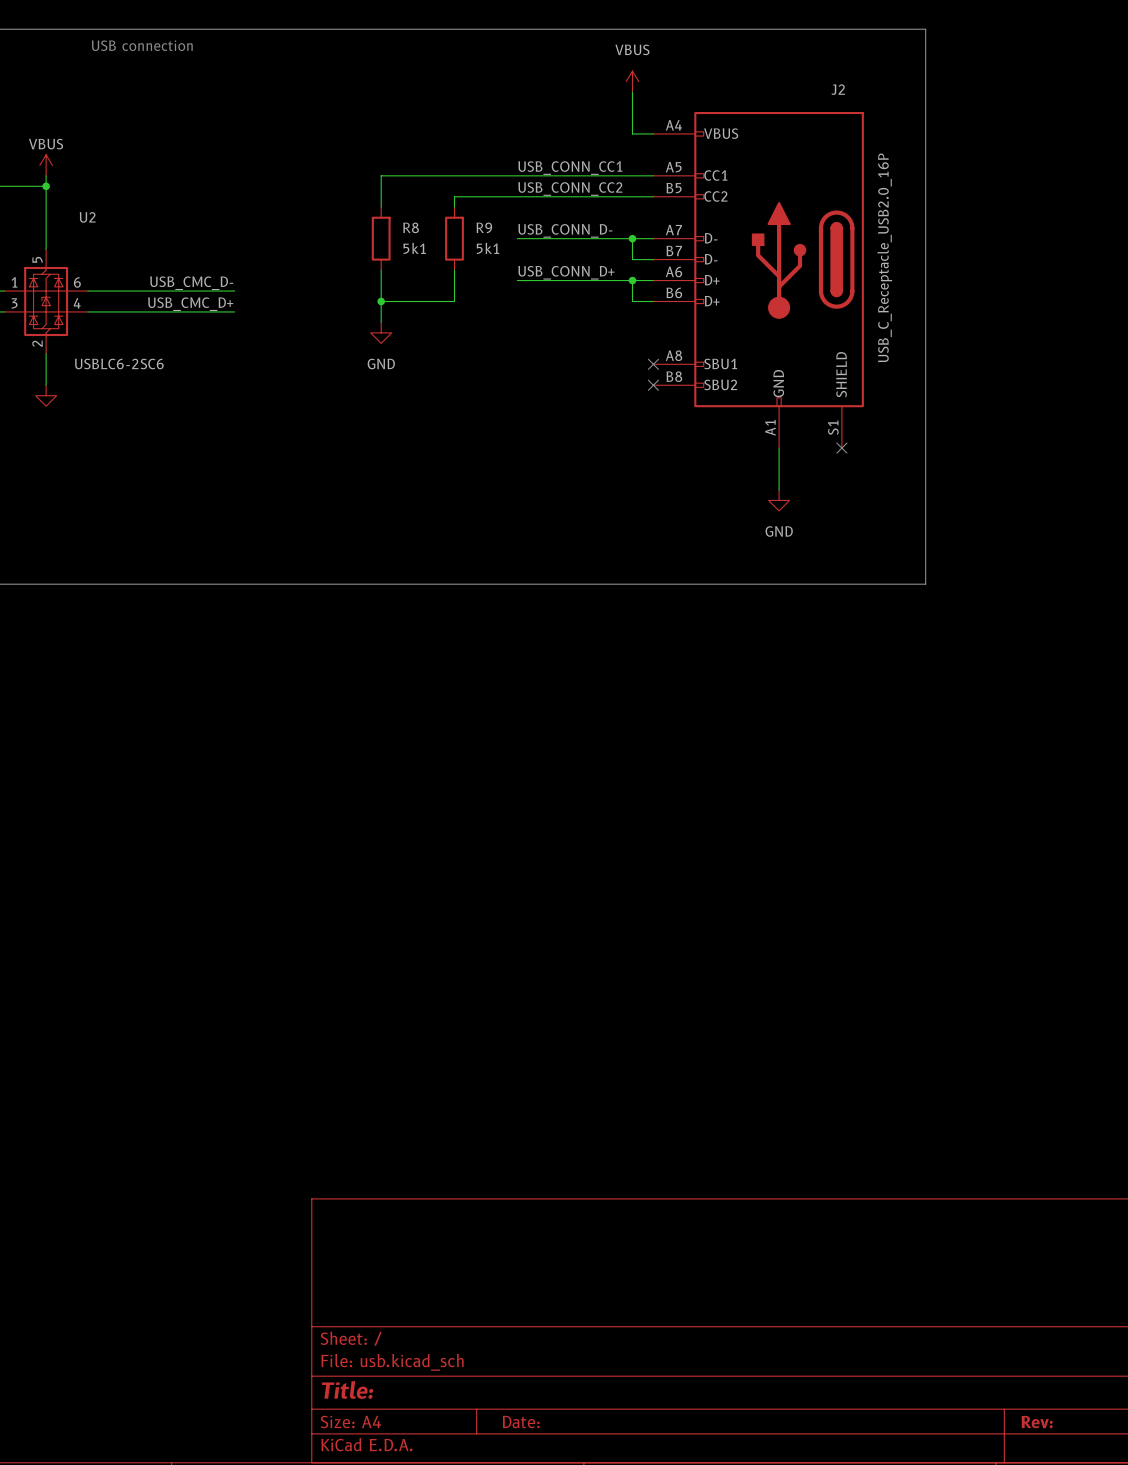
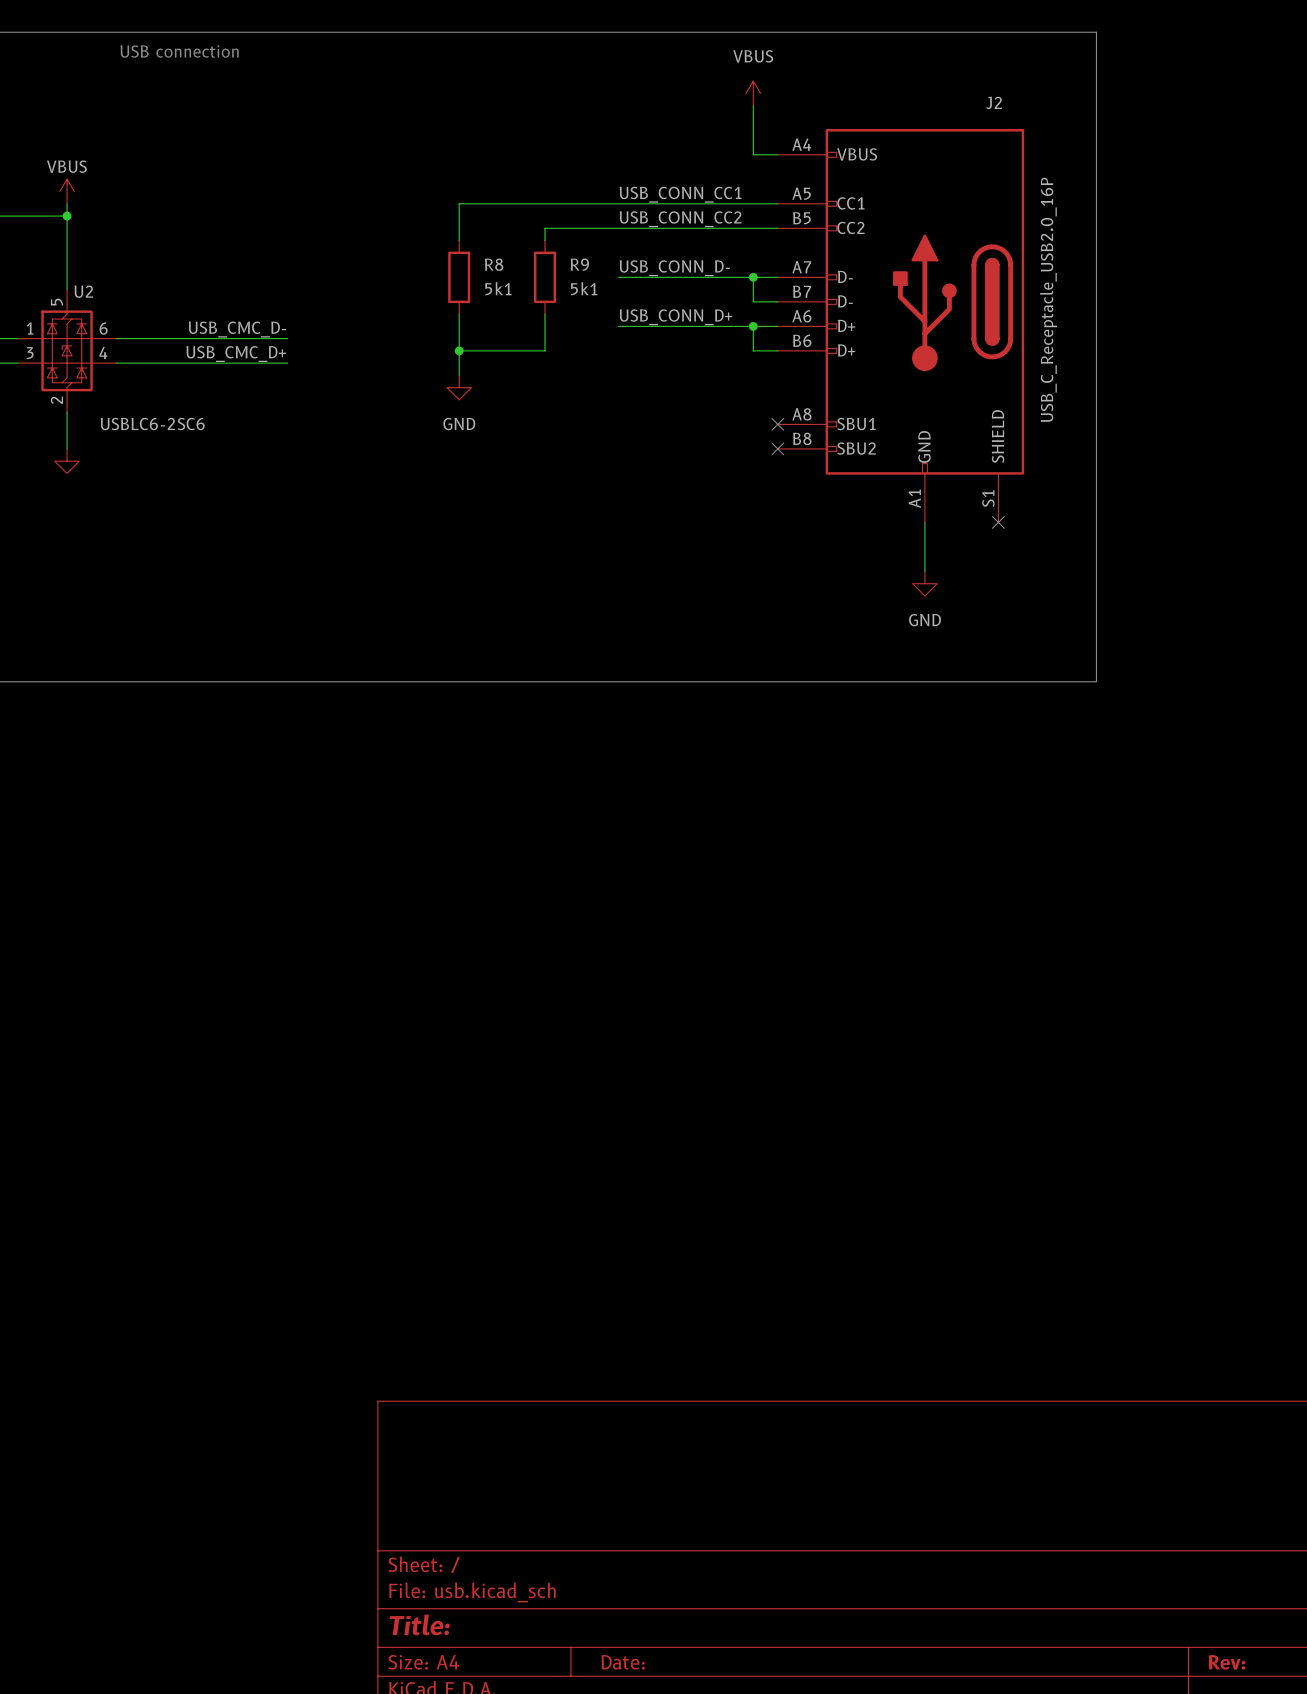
U2 name position: U2 (87, 217) -> U2 (83, 291)

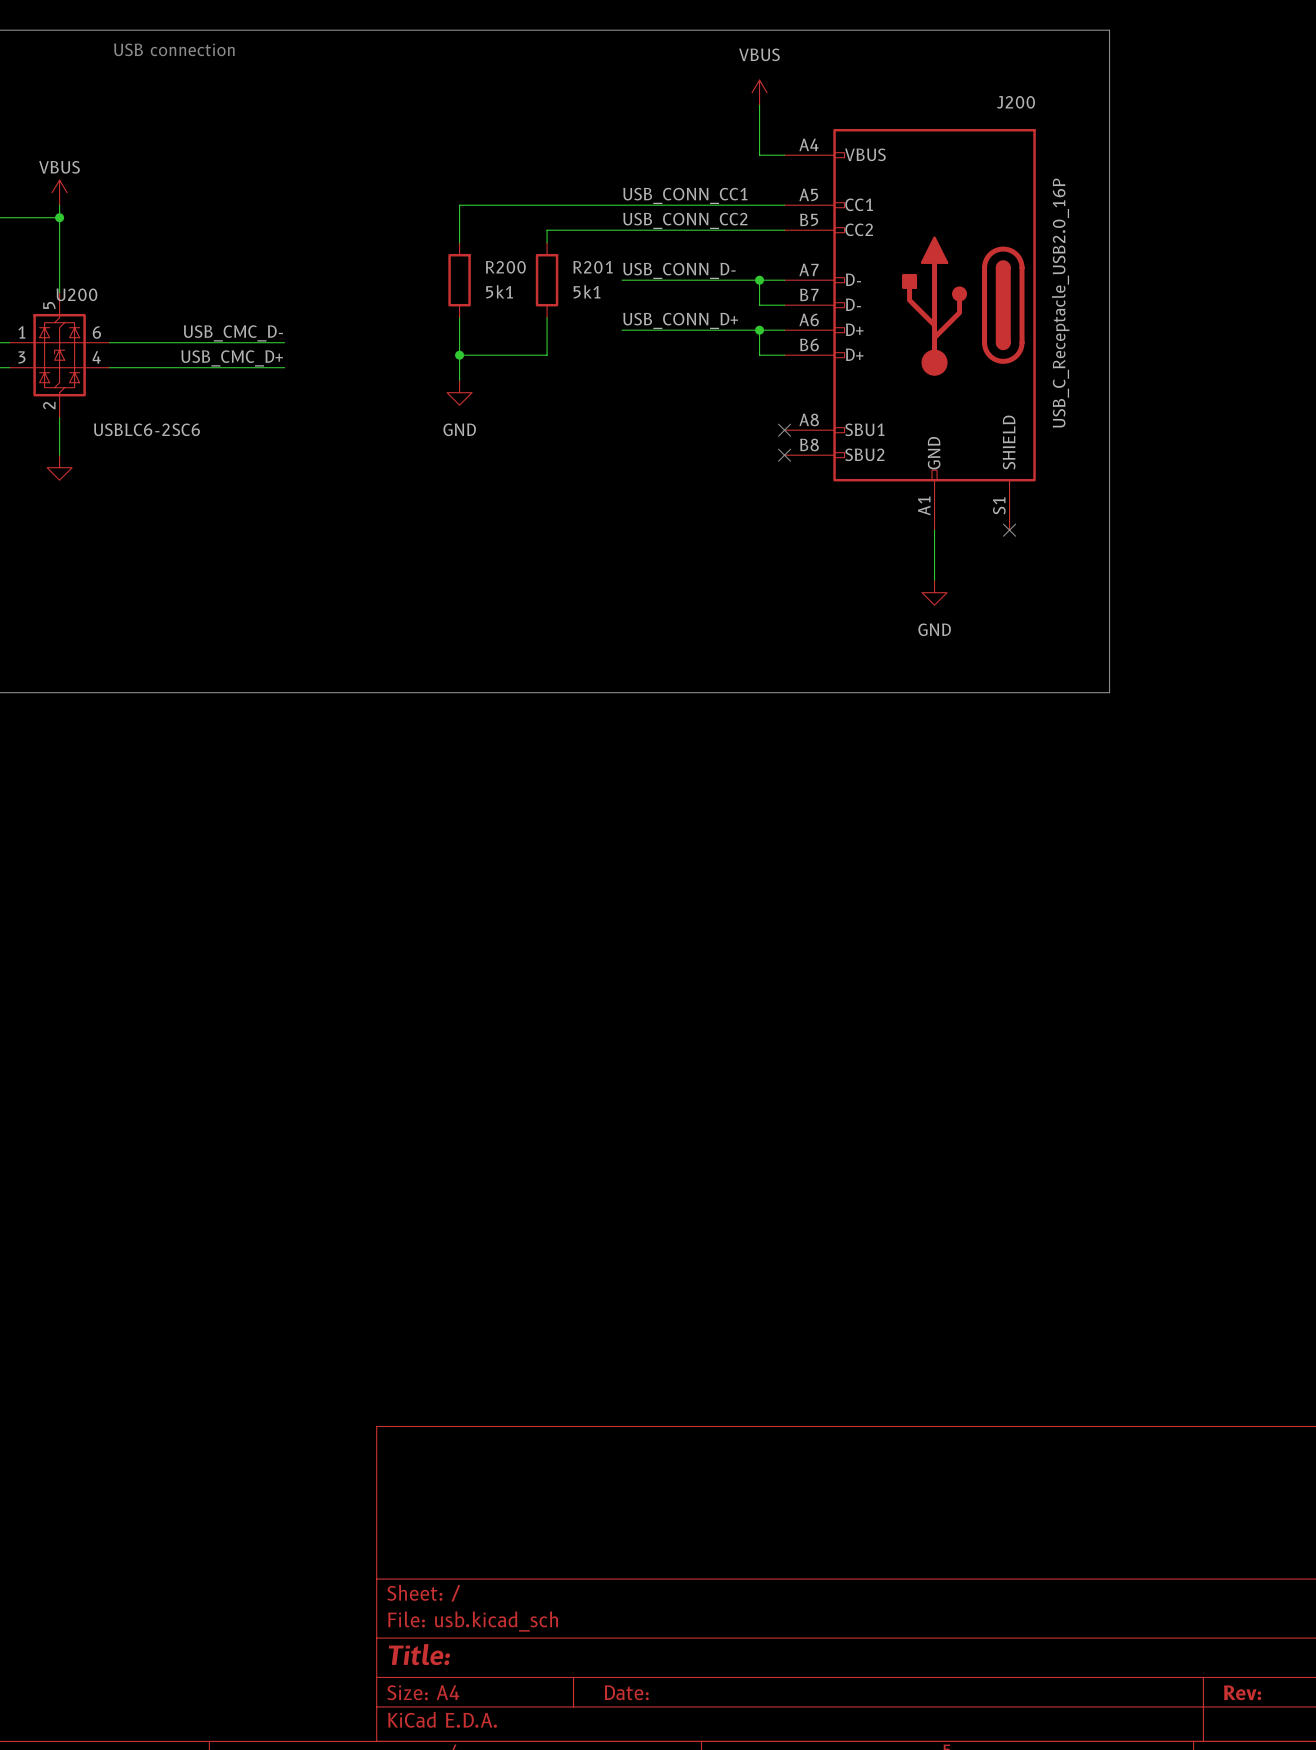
J2 name: J2 (994, 102) -> J200 (1015, 102)
R8 name: R8 (494, 264) -> R200 (505, 267)
R9 name: R9 (579, 264) -> R201 (593, 267)
U2 name: U2 (83, 291) -> U200 (76, 294)

